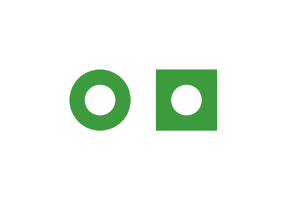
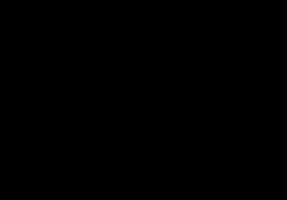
part: (143, 100) -> none

